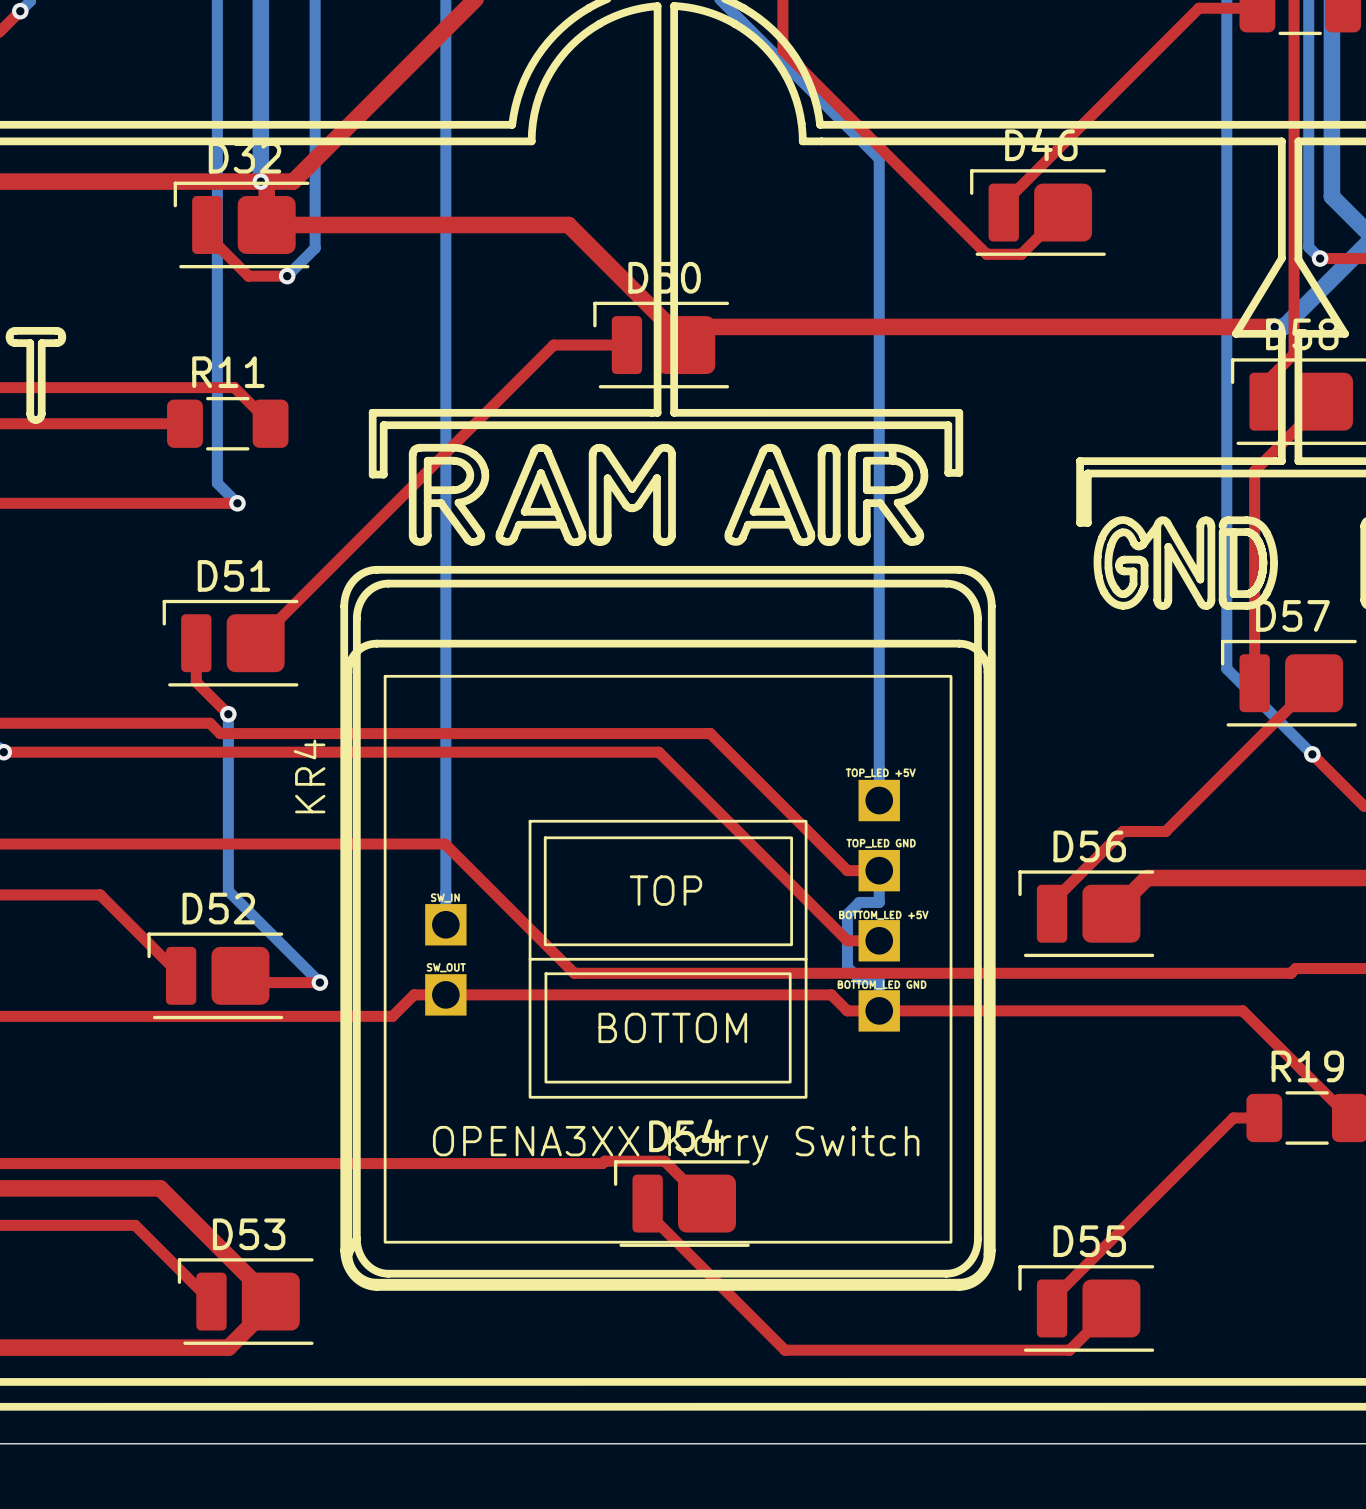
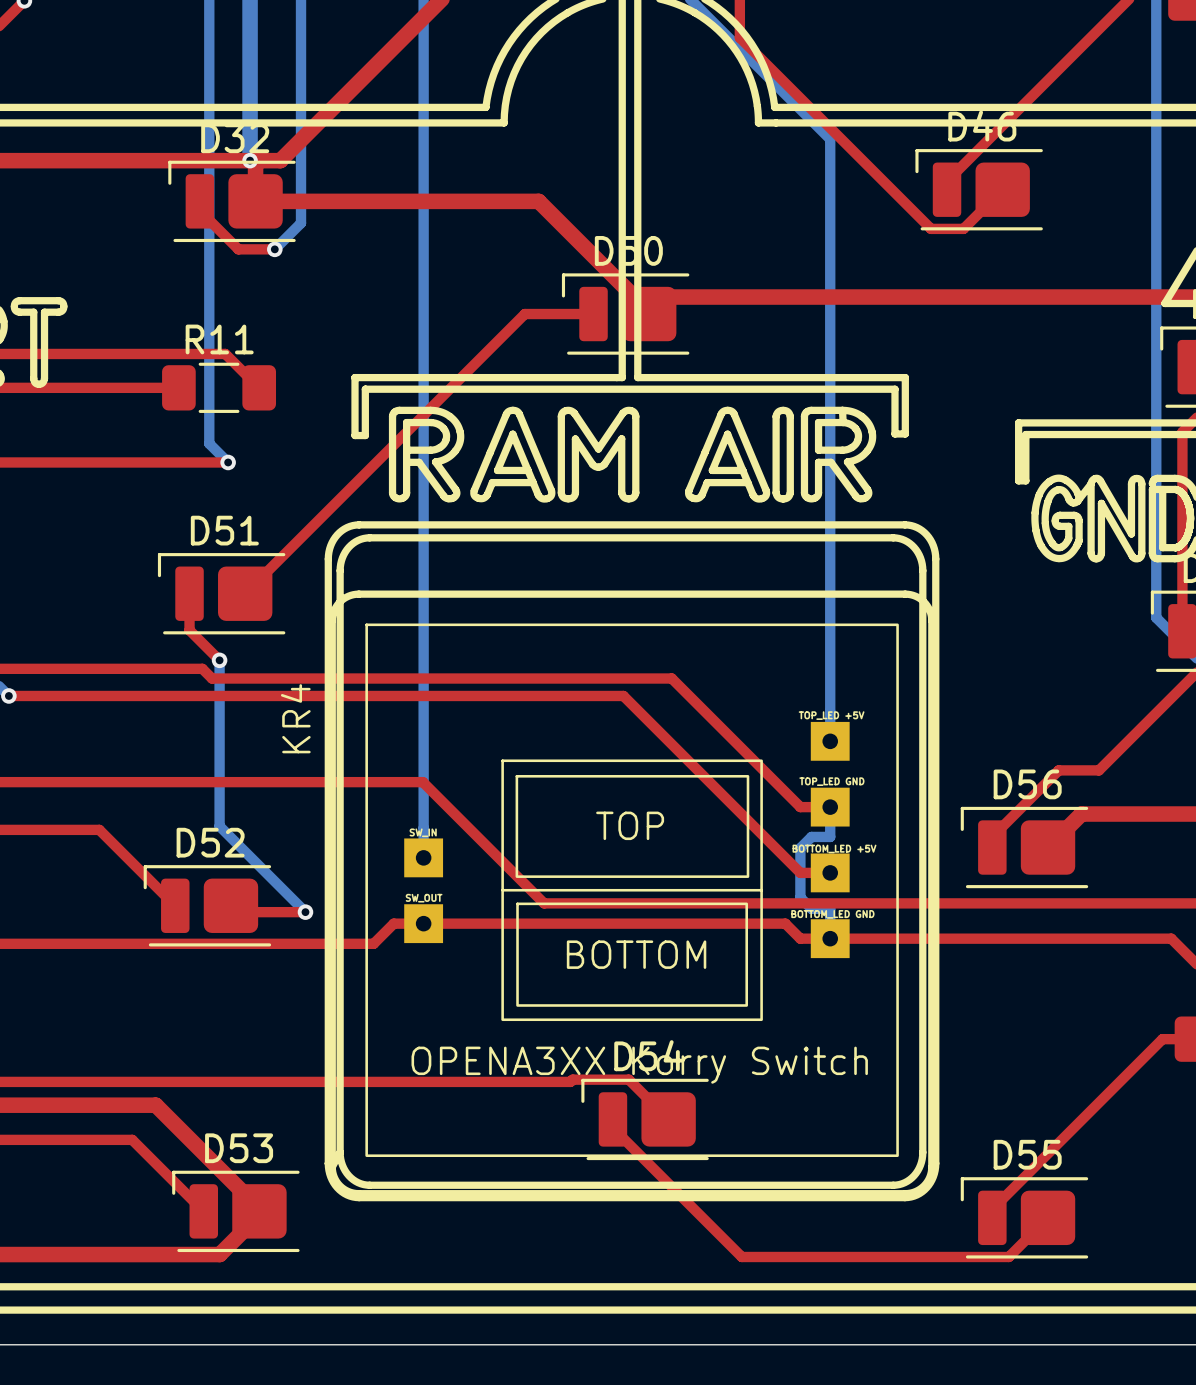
KR4 footprint: [383, 674, 953, 1244] -> [365, 623, 899, 1157]

